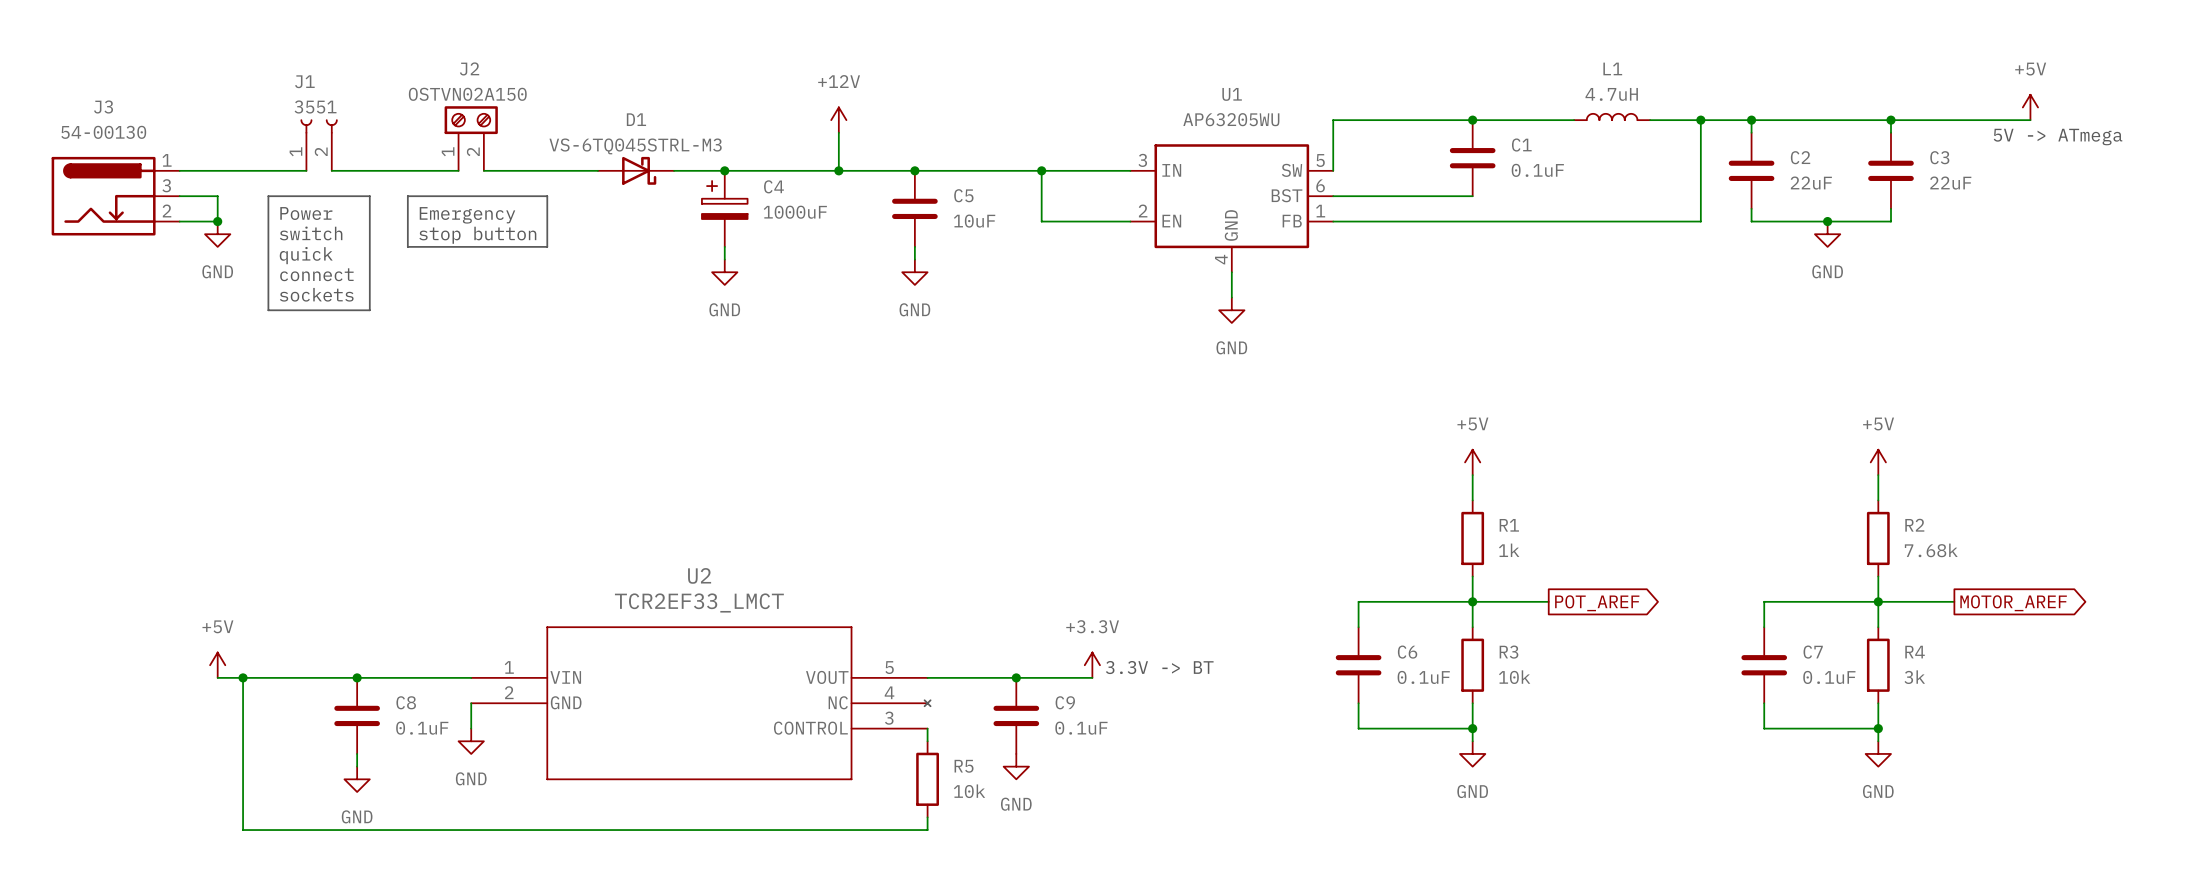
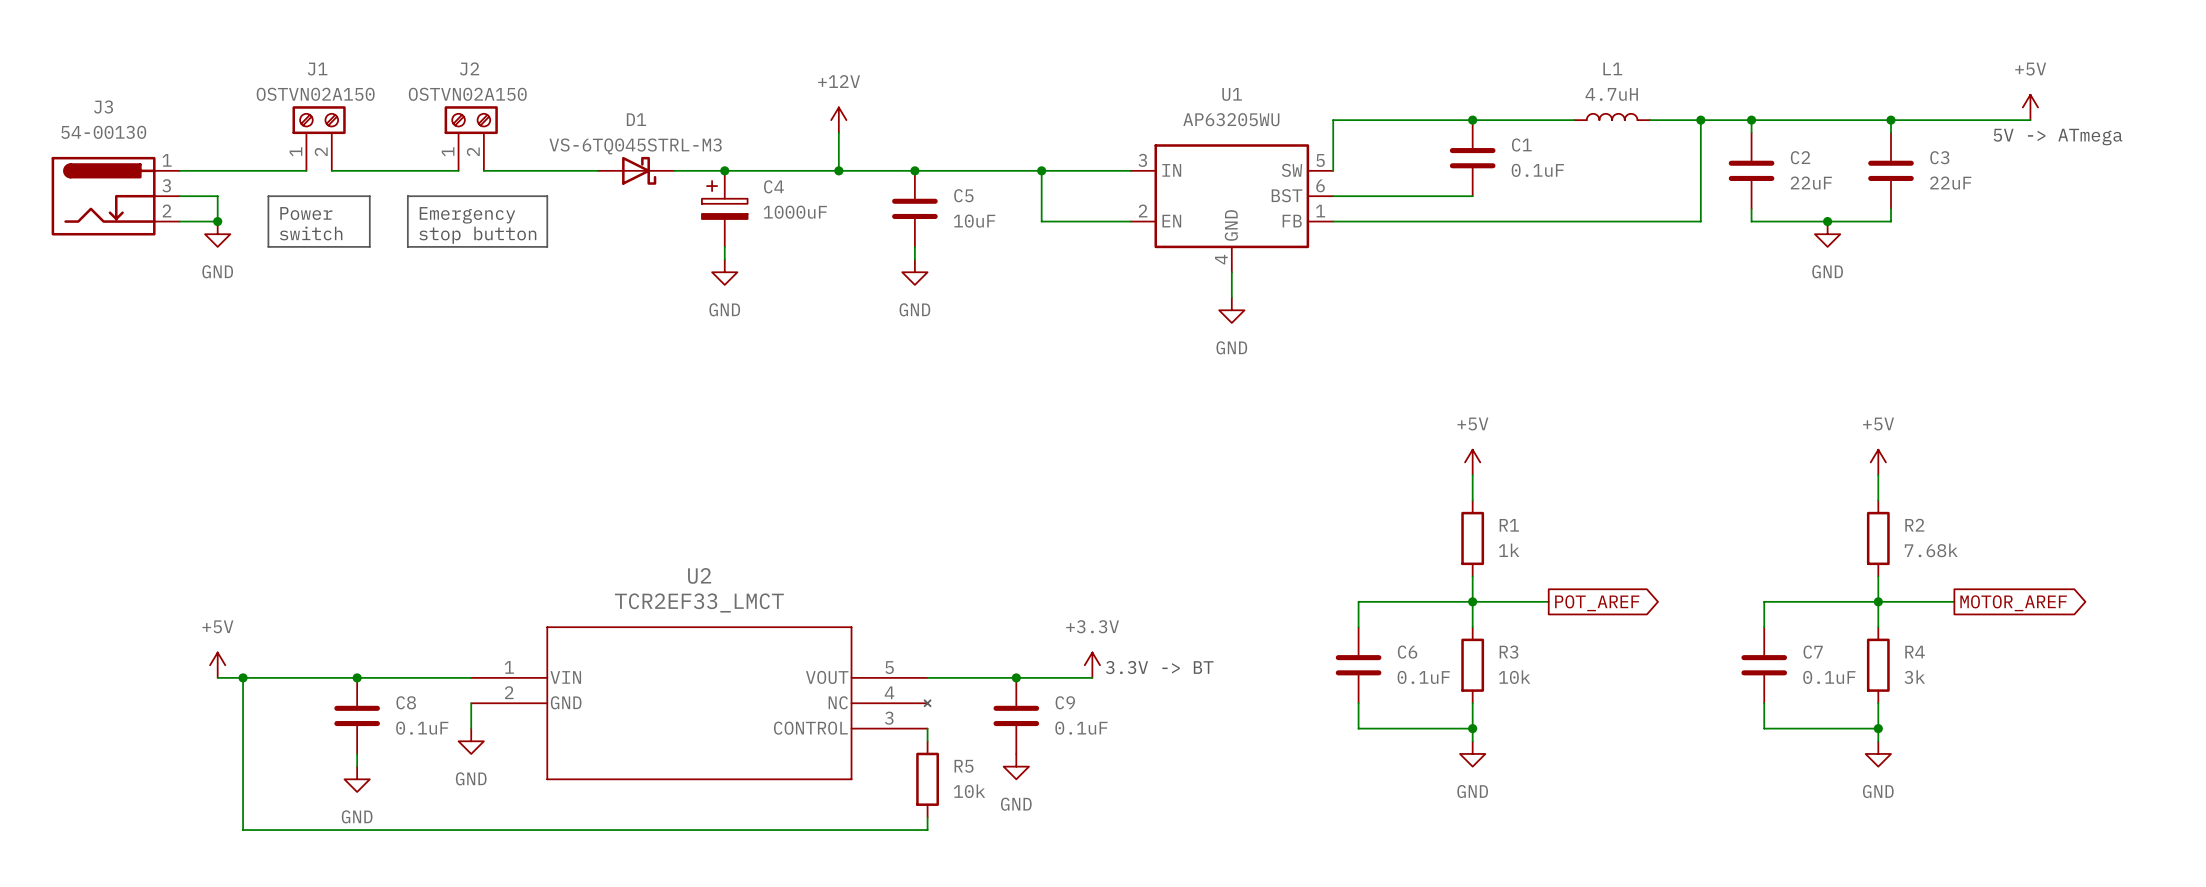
J1 value: 3551 (315, 106) -> OSTVN02A150 (315, 94)
J1 symbol: [300, 119, 338, 171] -> [292, 106, 346, 171]
line: (268, 246) (268, 310) (369, 310) (369, 246) -> (268, 246) (369, 246)
text: quick (306, 255) -> none
text: connect (316, 274) -> none
text: sockets (316, 294) -> none

